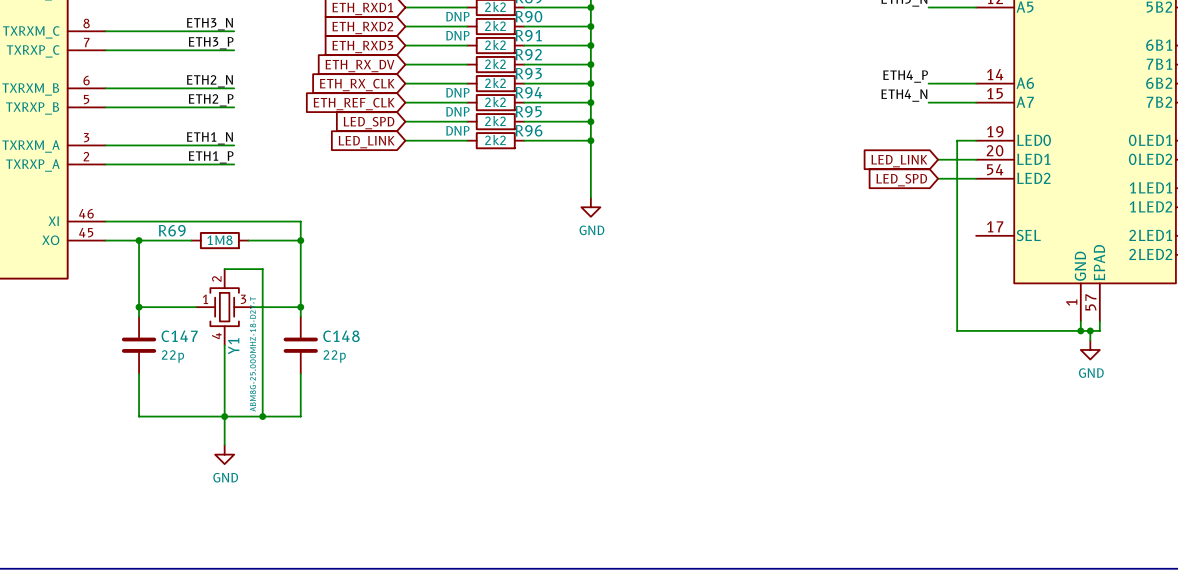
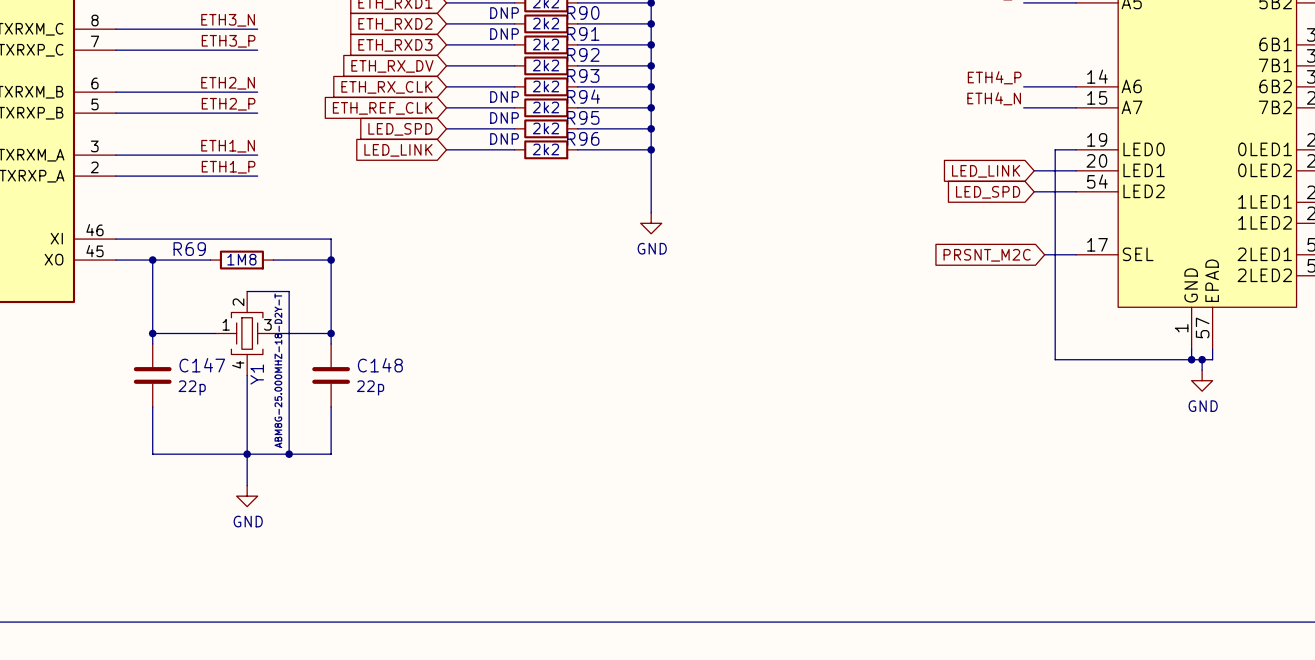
wire: none -> (1044, 254) (1076, 254)
global label: none -> PRSNT_M2C (987, 255)

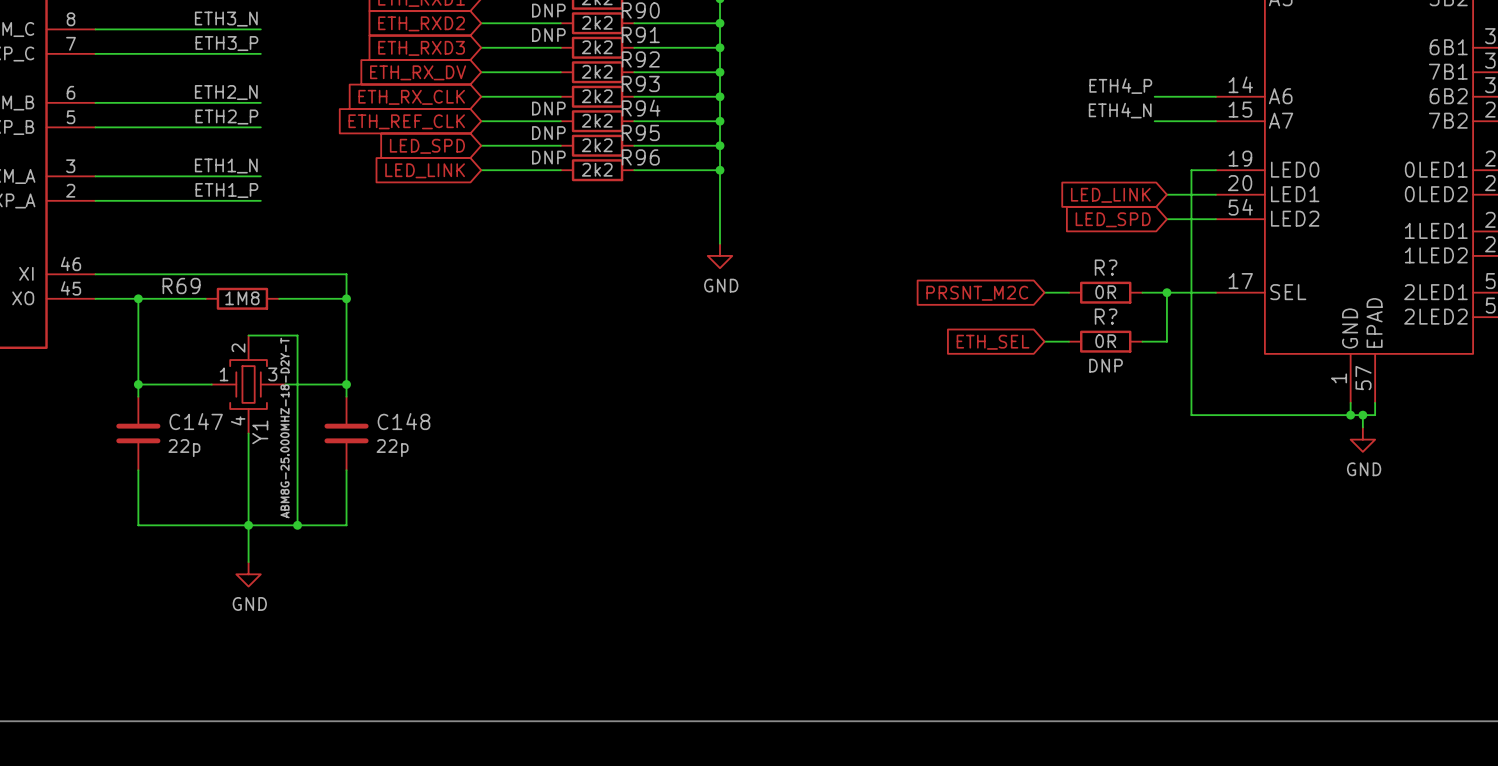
wire: none -> (1044, 292) (1068, 292)
R?: none -> (1105, 292)
wire: none -> (1142, 292) (1179, 292)
wire: none -> (1166, 292) (1166, 341) (1142, 341)
junction: none -> (1166, 292)
global label position: PRSNT_M2C (987, 255) -> PRSNT_M2C (977, 293)
wire: none -> (1044, 341) (1068, 341)
R?: none -> (1105, 341)
global label: none -> ETH_SEL (993, 342)

